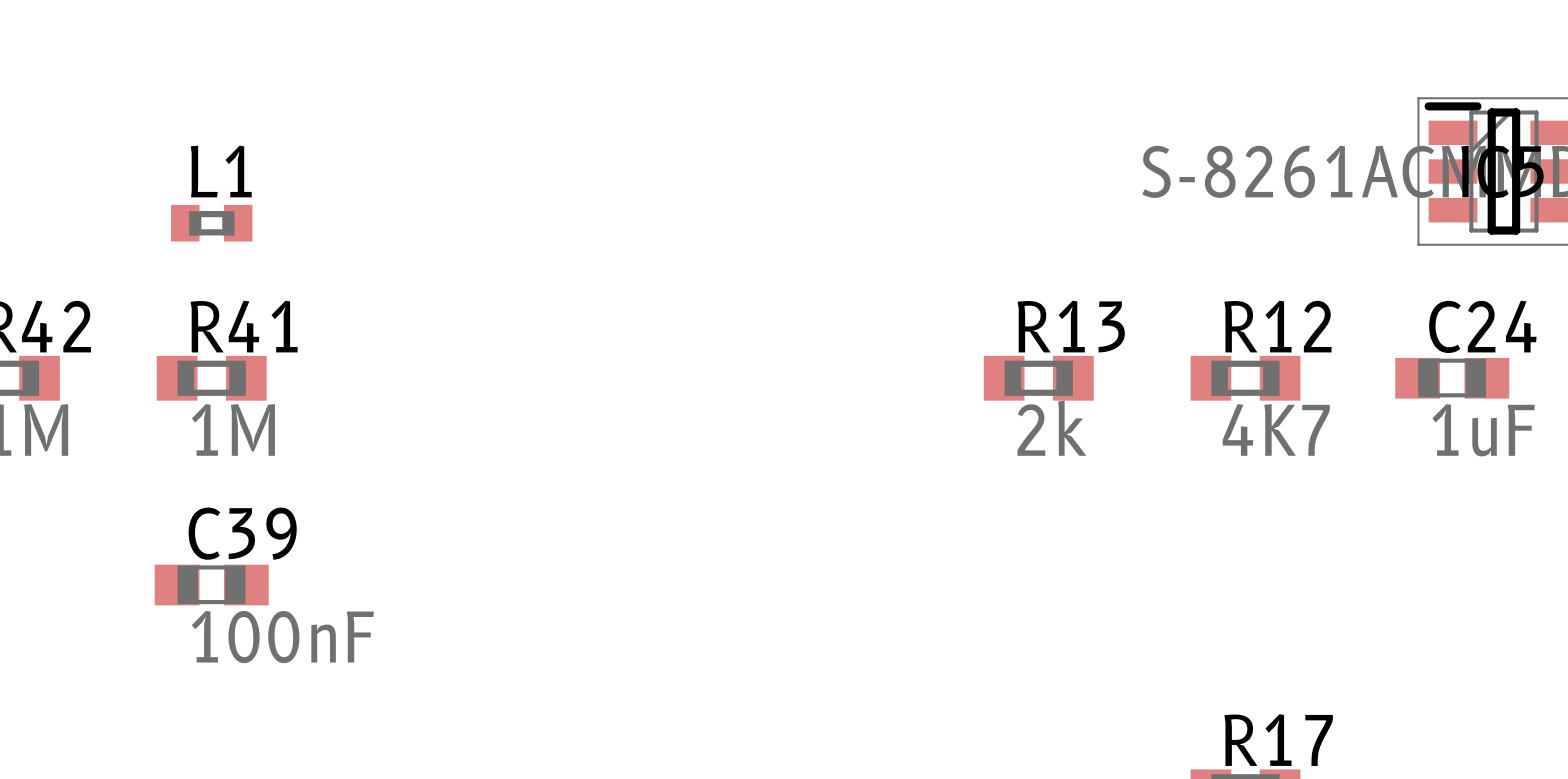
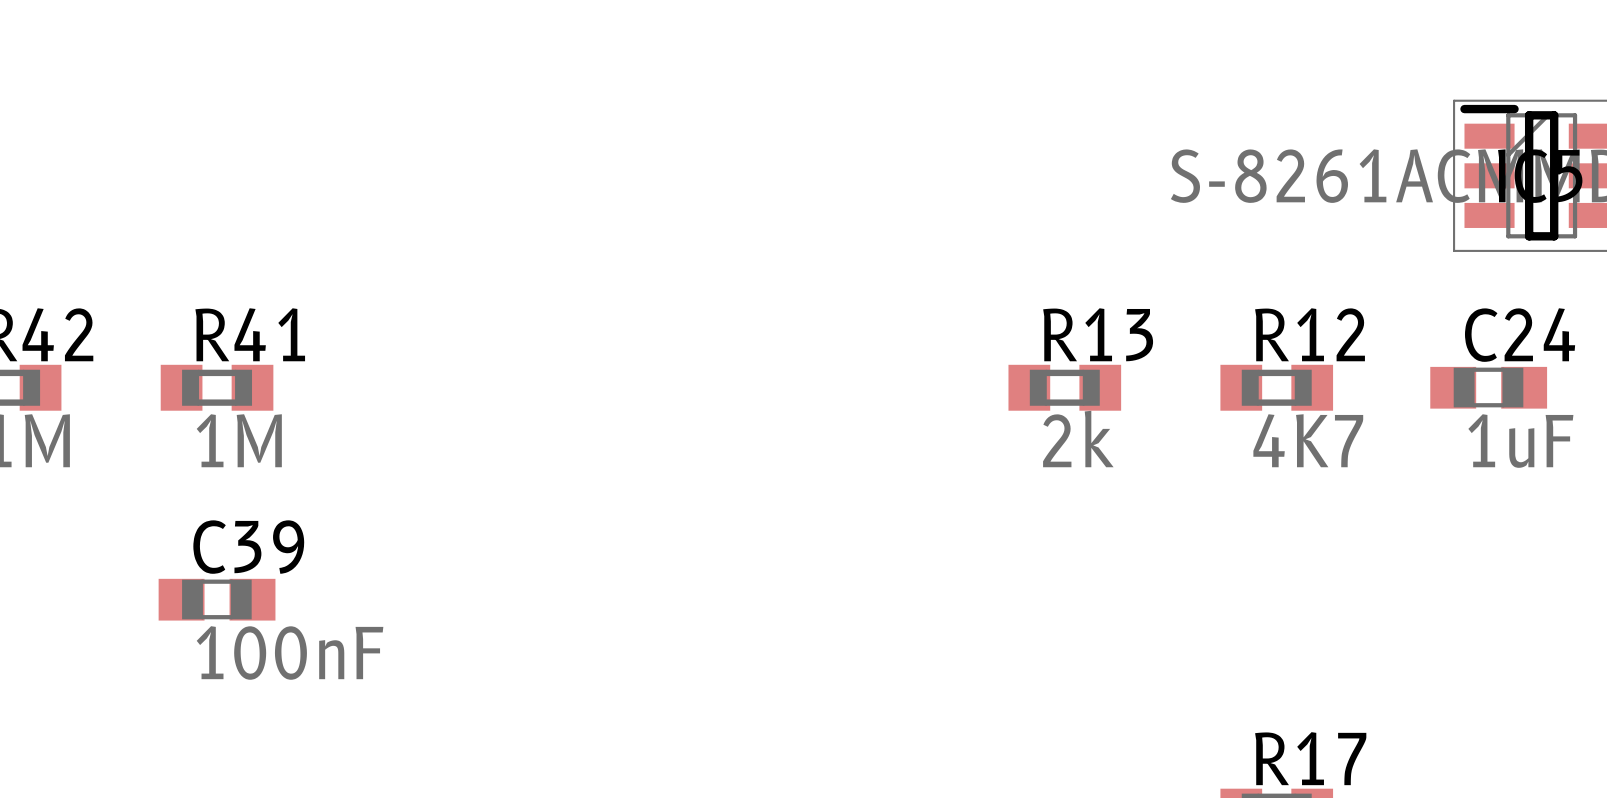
L1: (211, 223) -> none

